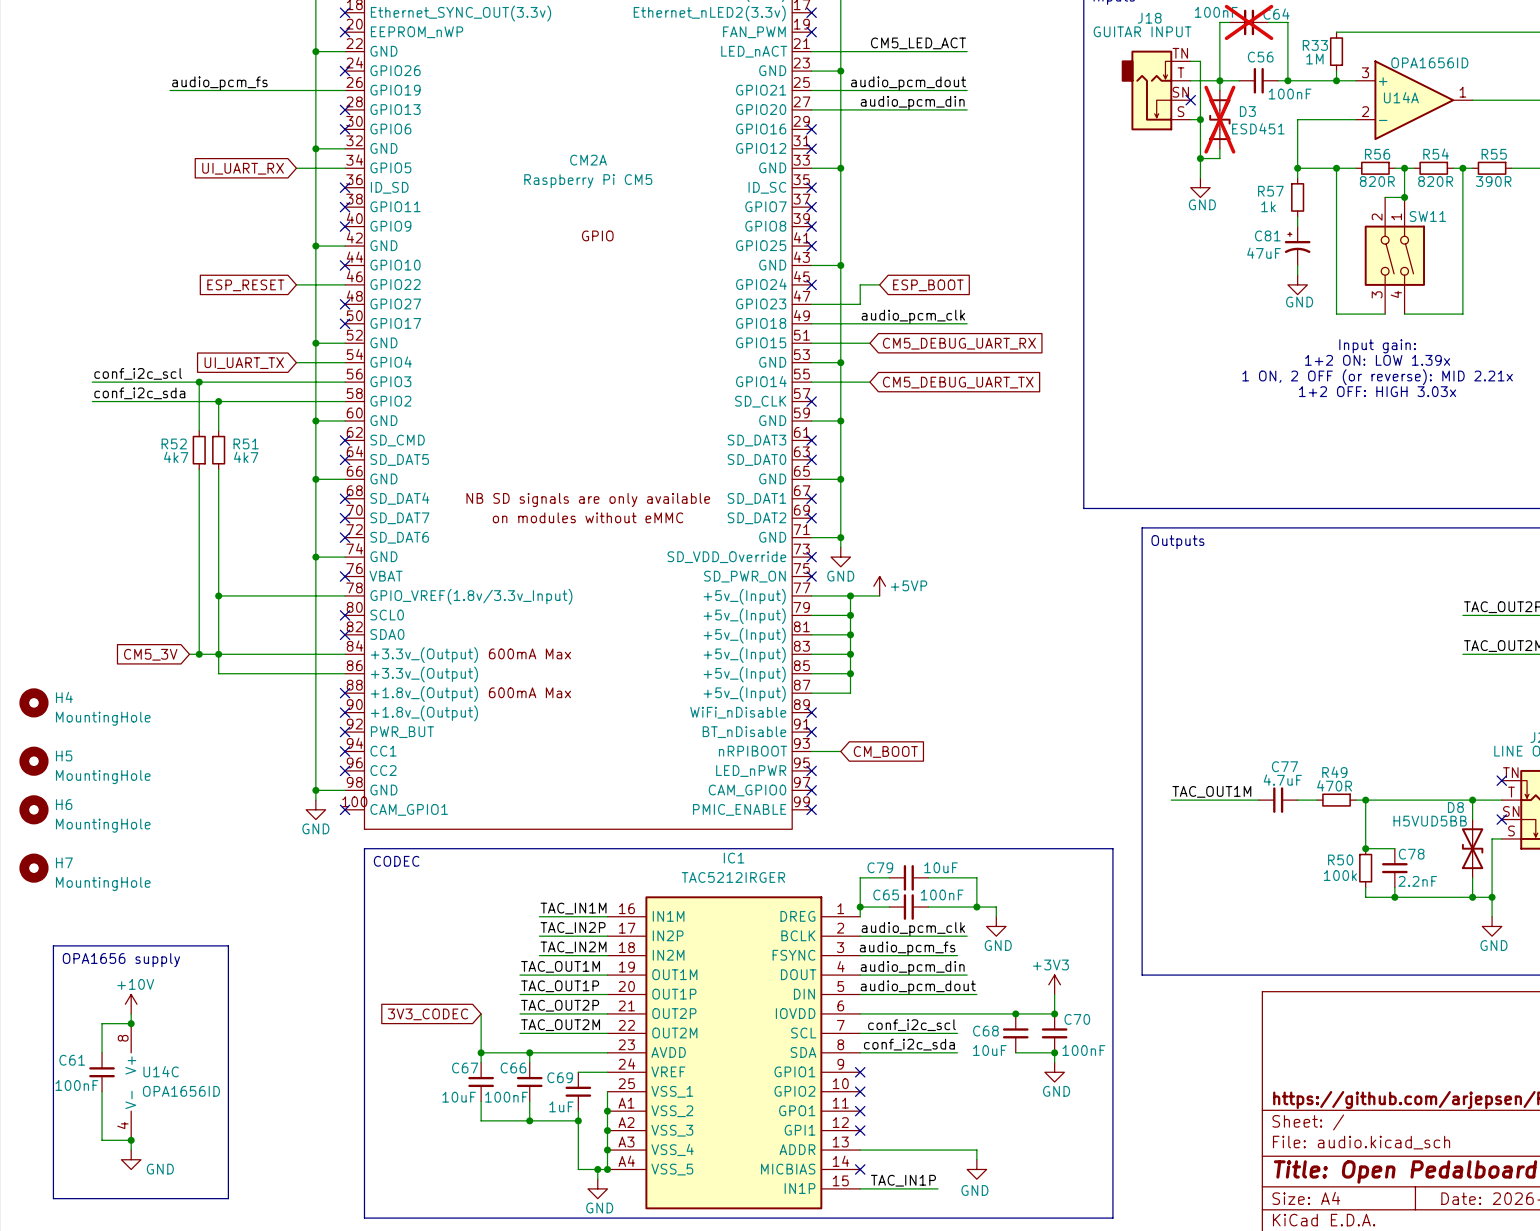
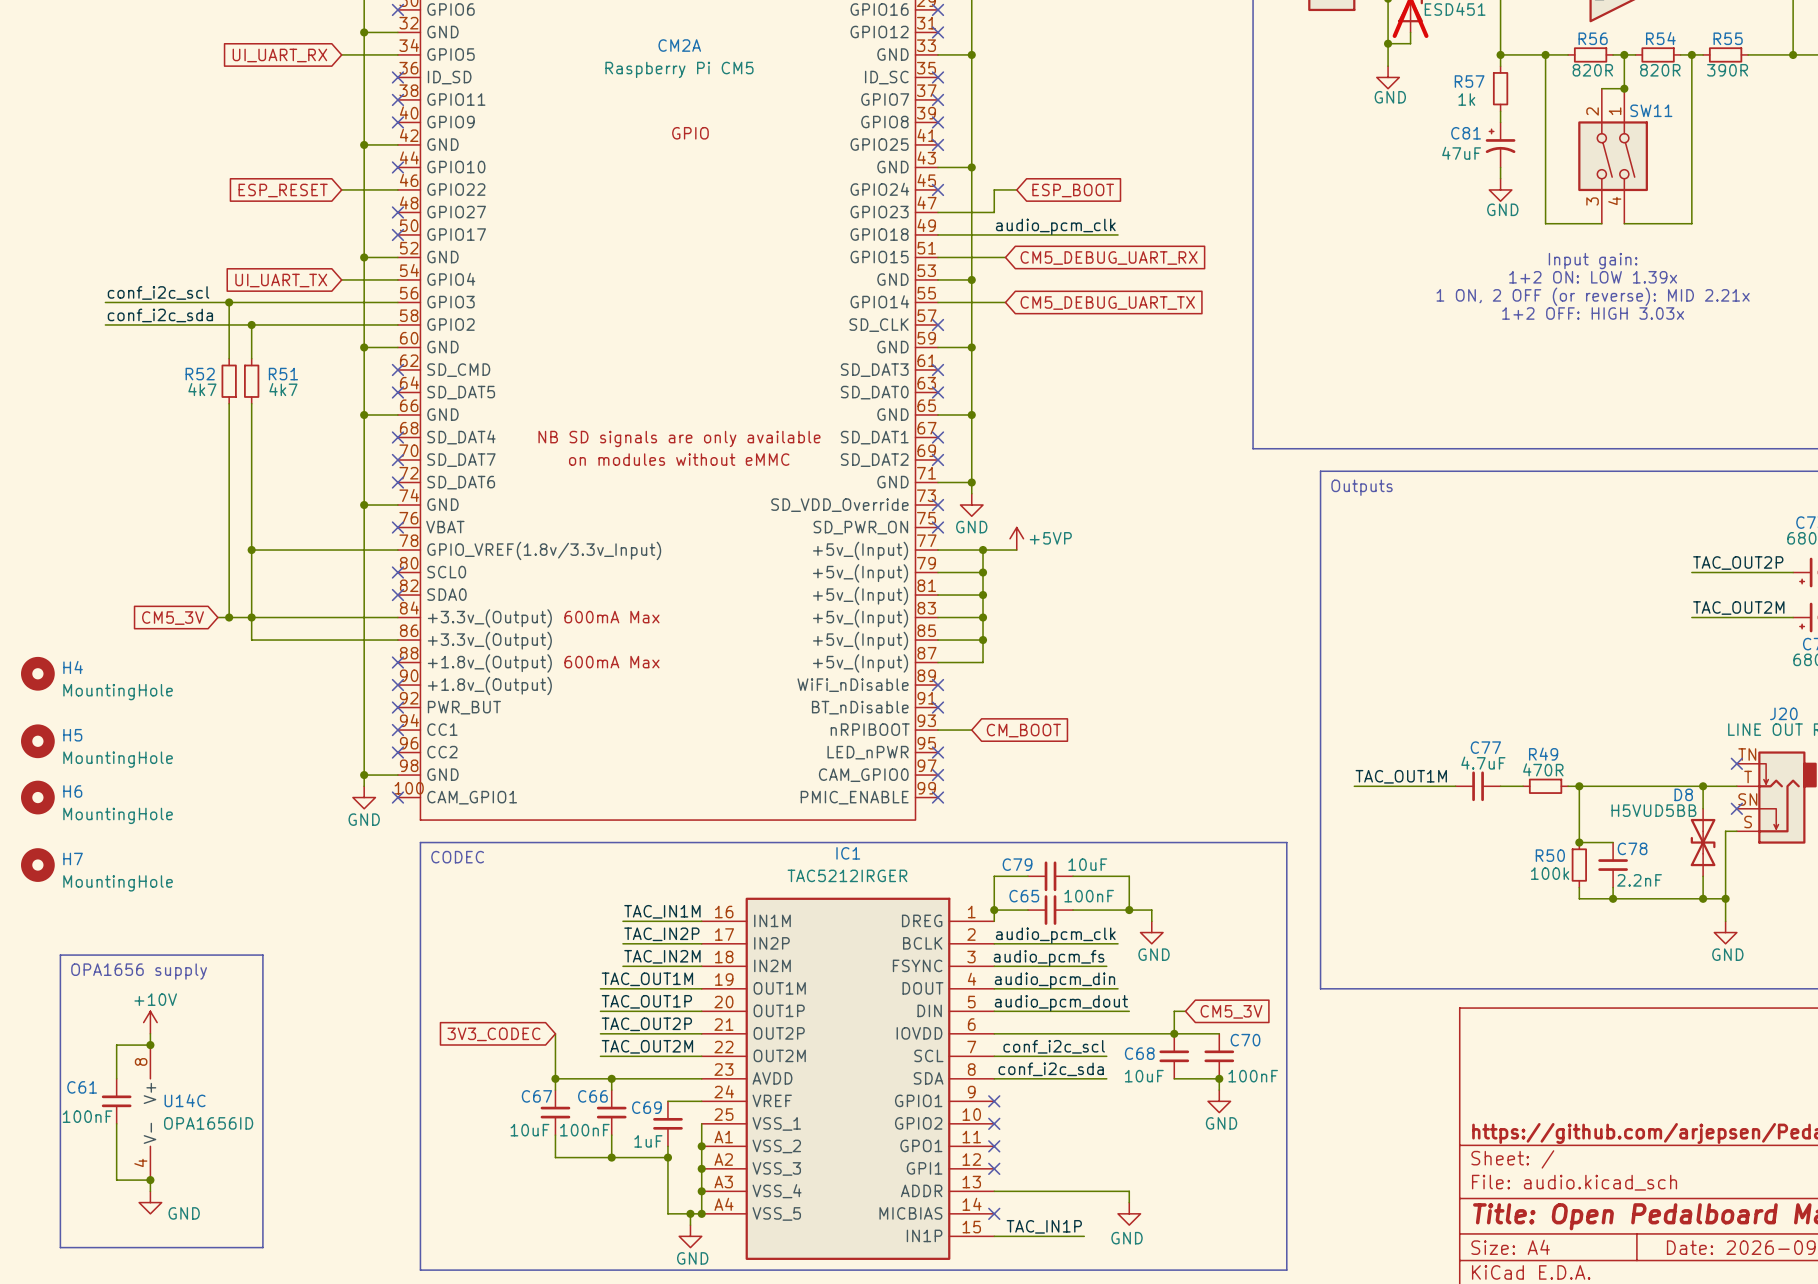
power symbol: +3V3 (1054, 984) -> none
wire: none -> (1185, 1011) (1174, 1011) (1174, 1033)
wire: (1054, 994) (1054, 1013) -> none
global label: none -> CM5_3V (1231, 1011)
junction: (1054, 1013) -> none

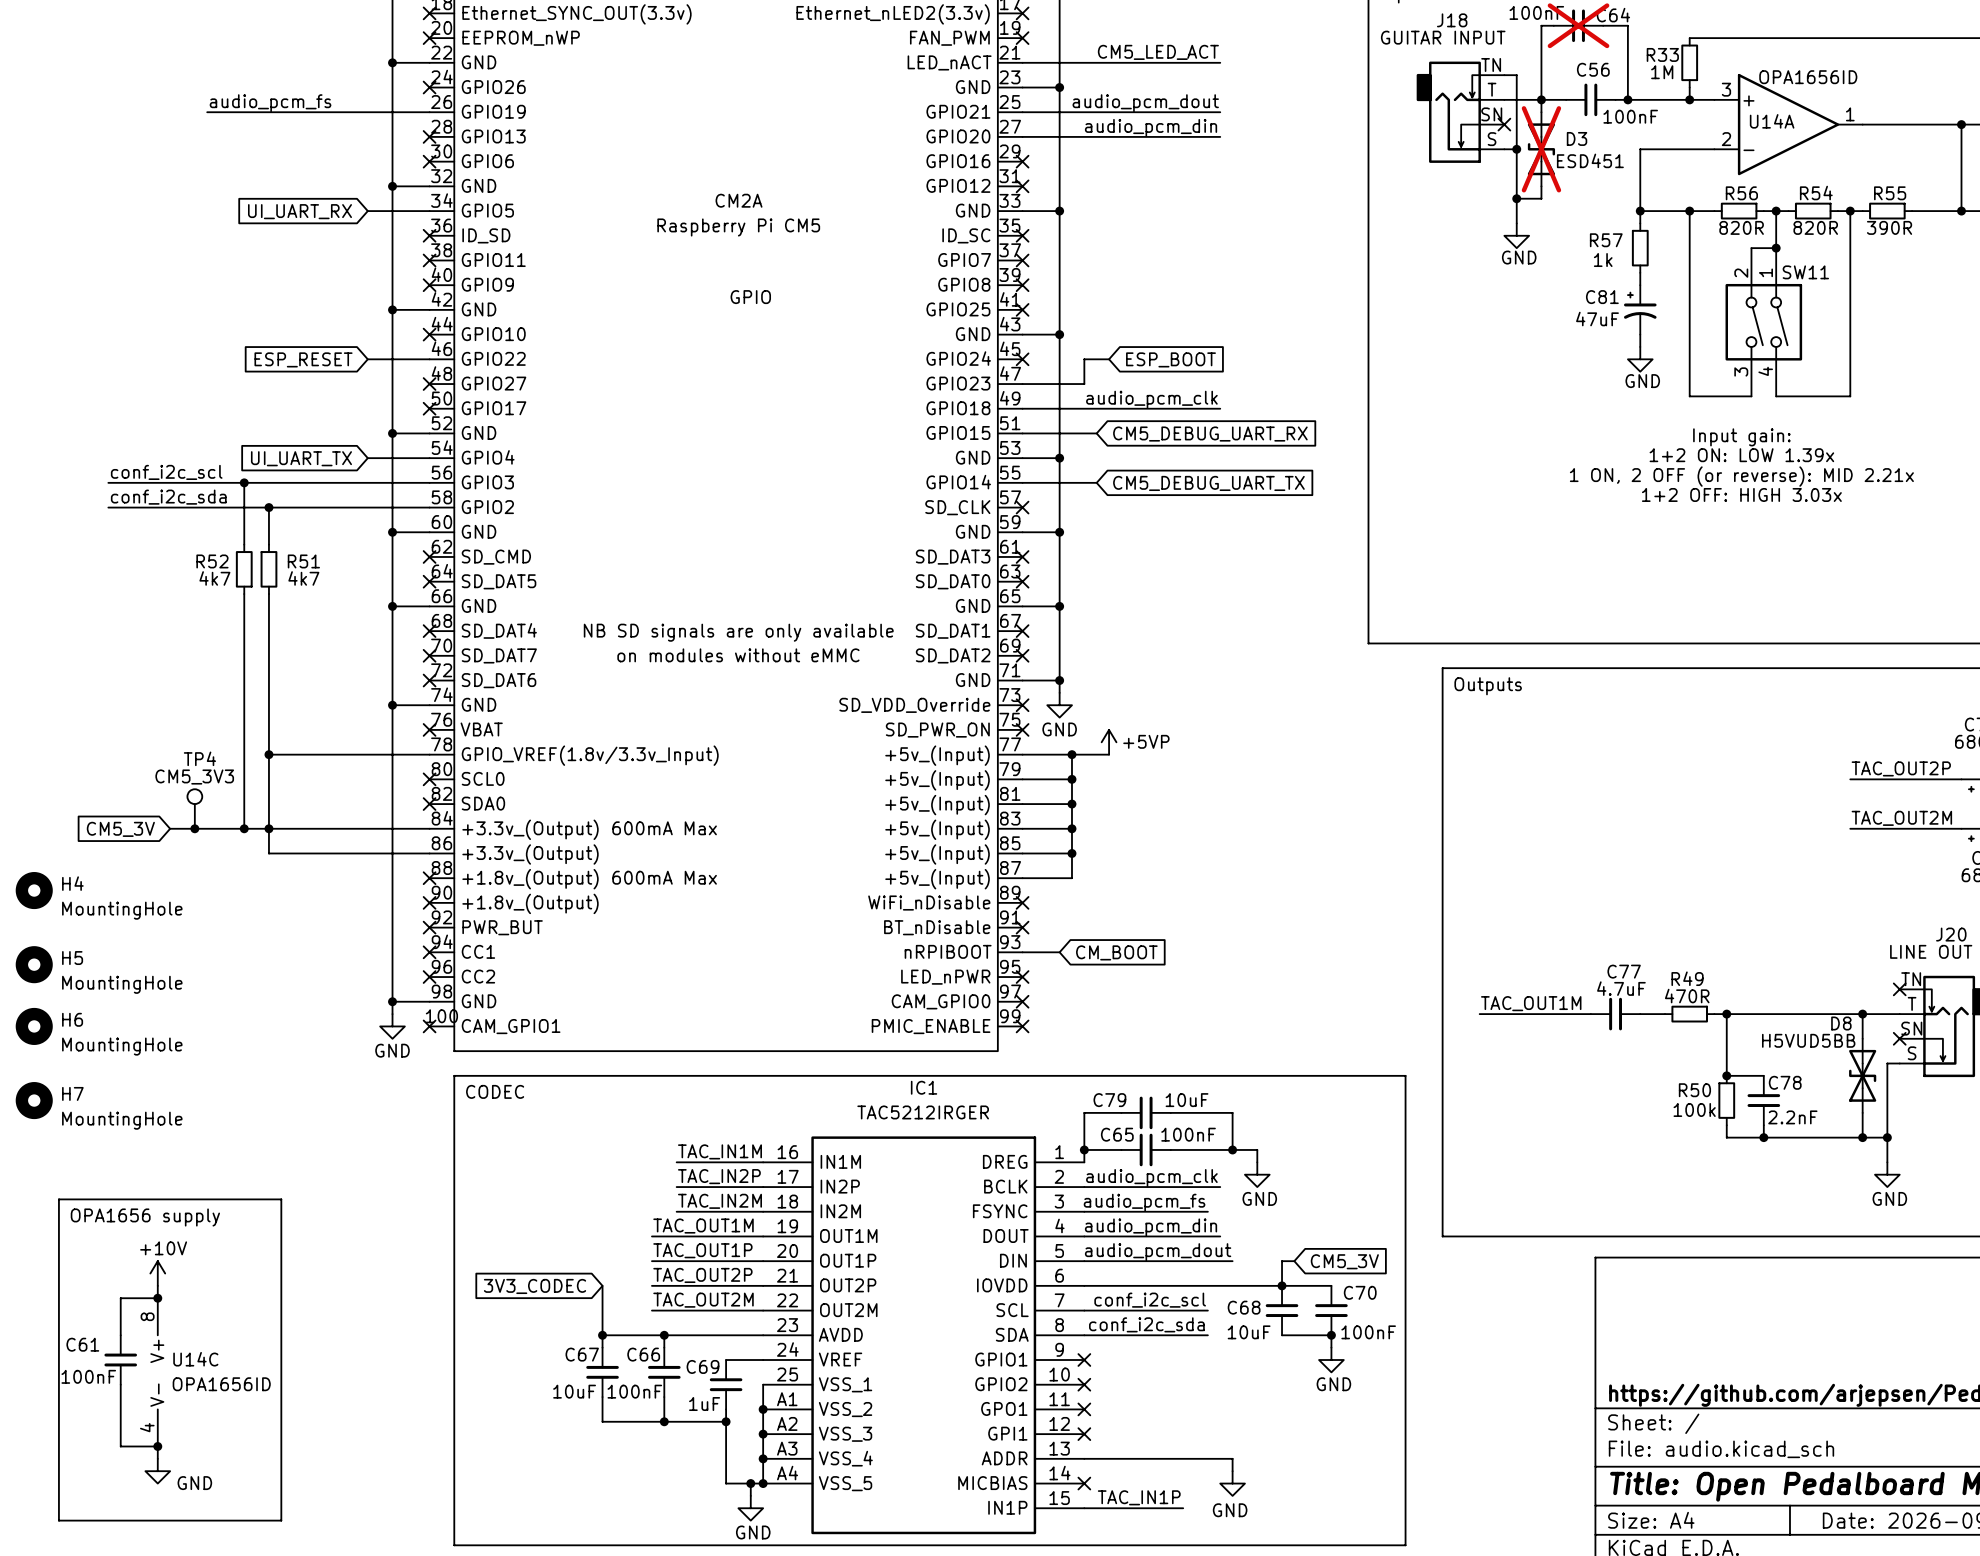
TP4: none -> CM5_3V3 (194, 809)
wire: none -> (170, 828) (231, 828)
junction: none -> (194, 828)
global label position: CM5_3V (173, 618) -> CM5_3V (120, 829)

